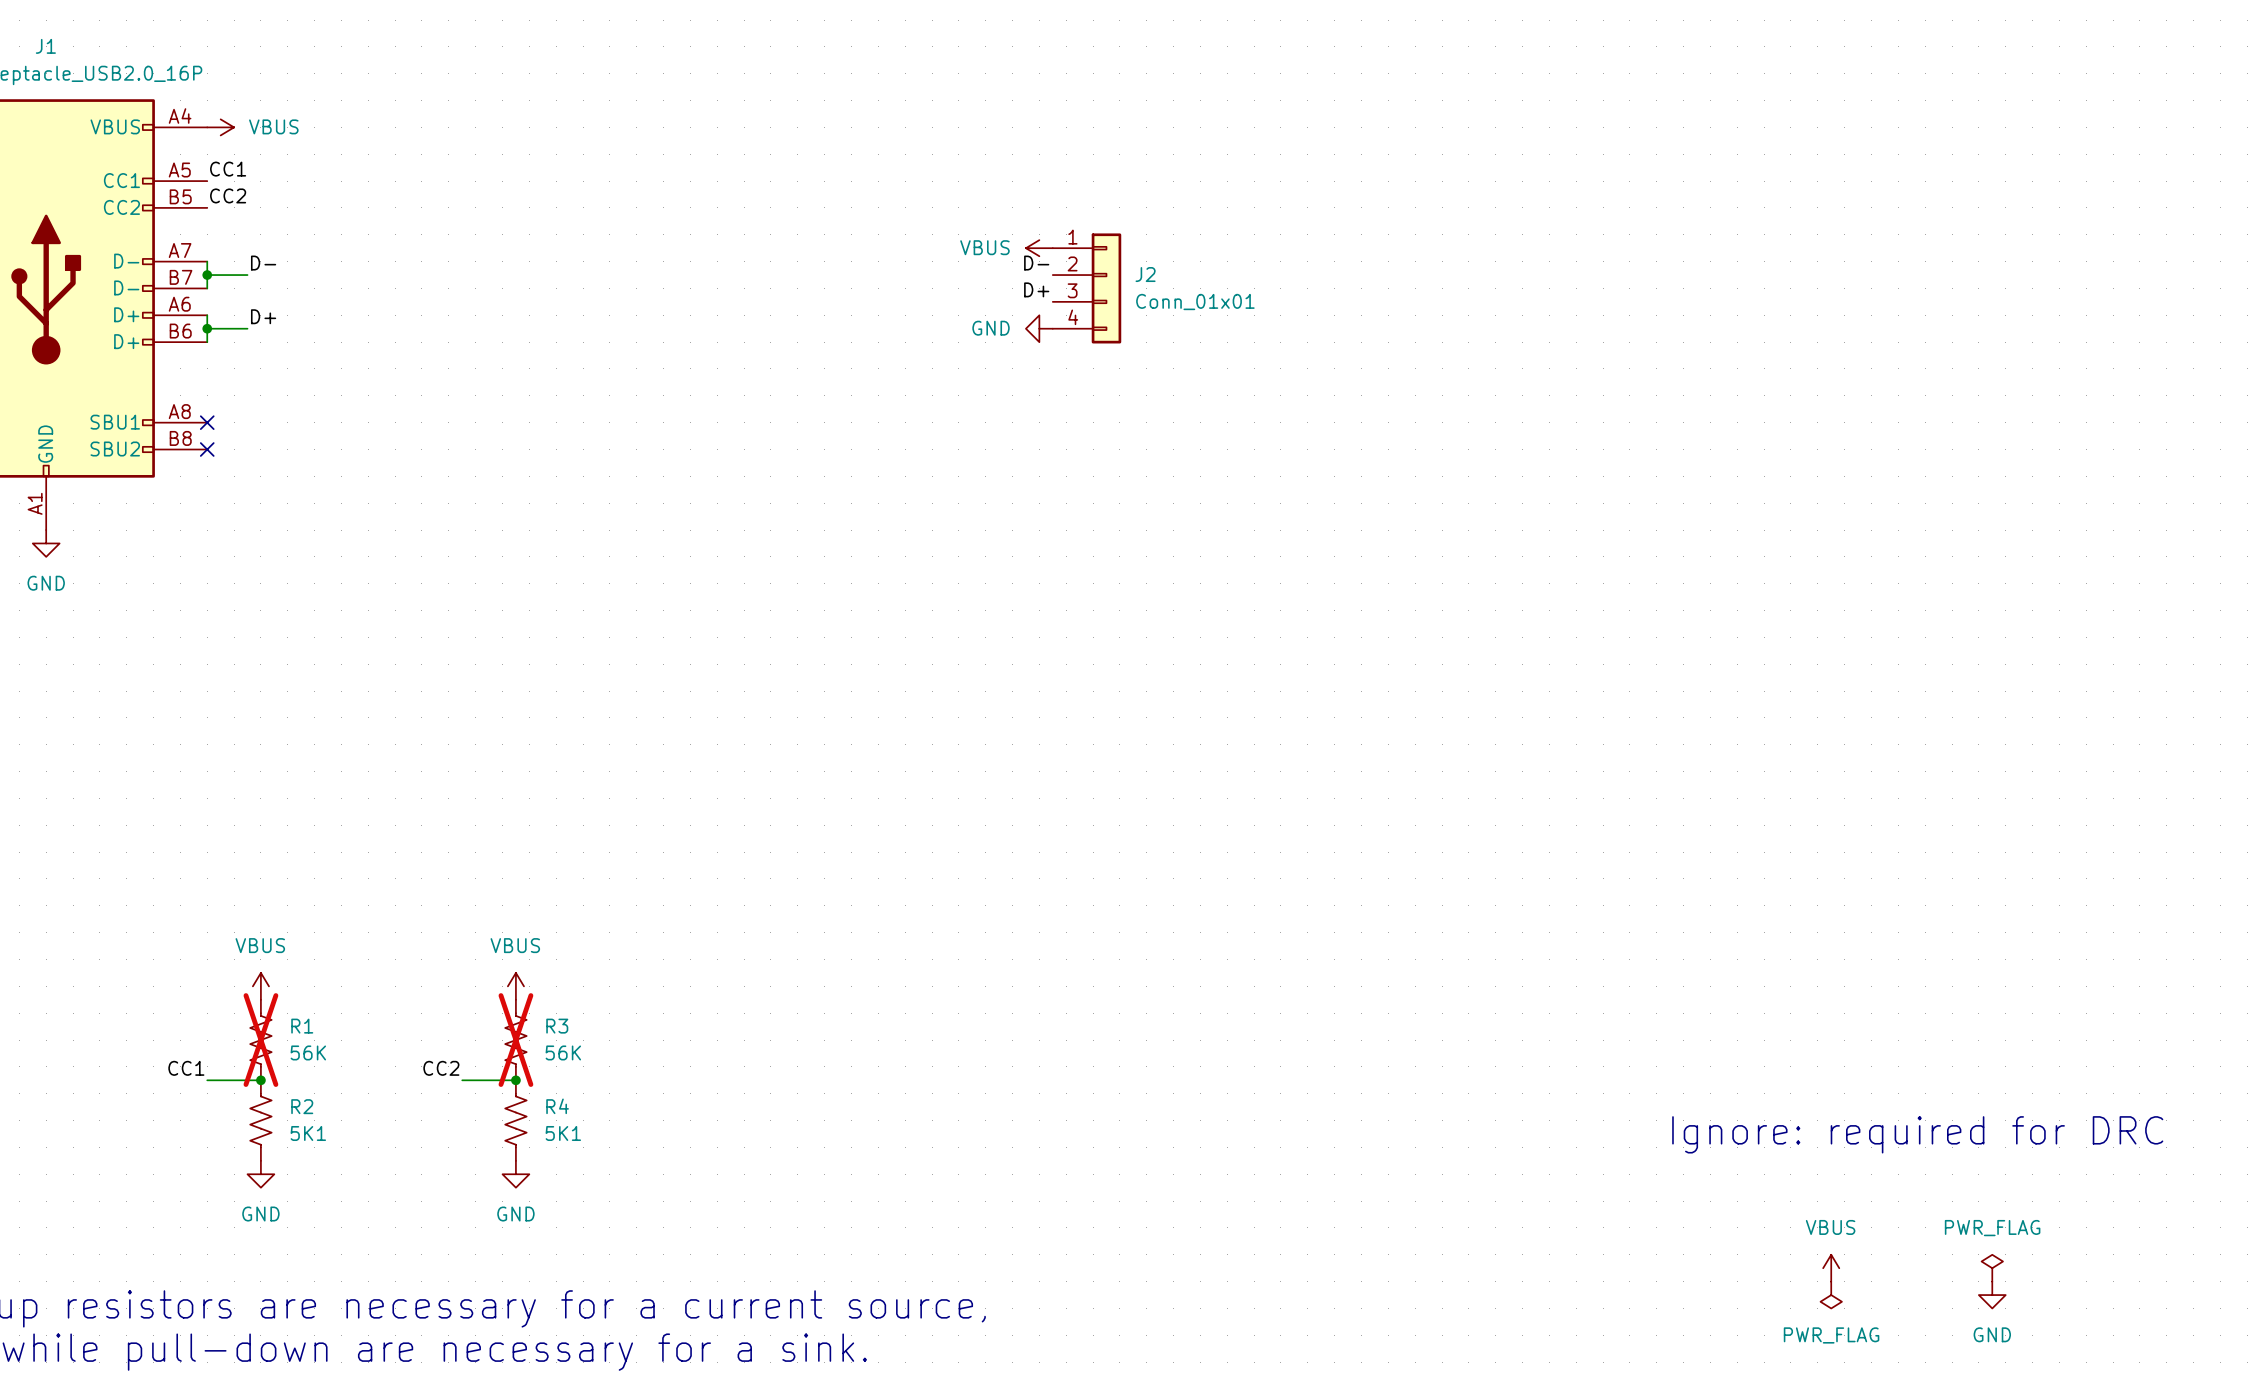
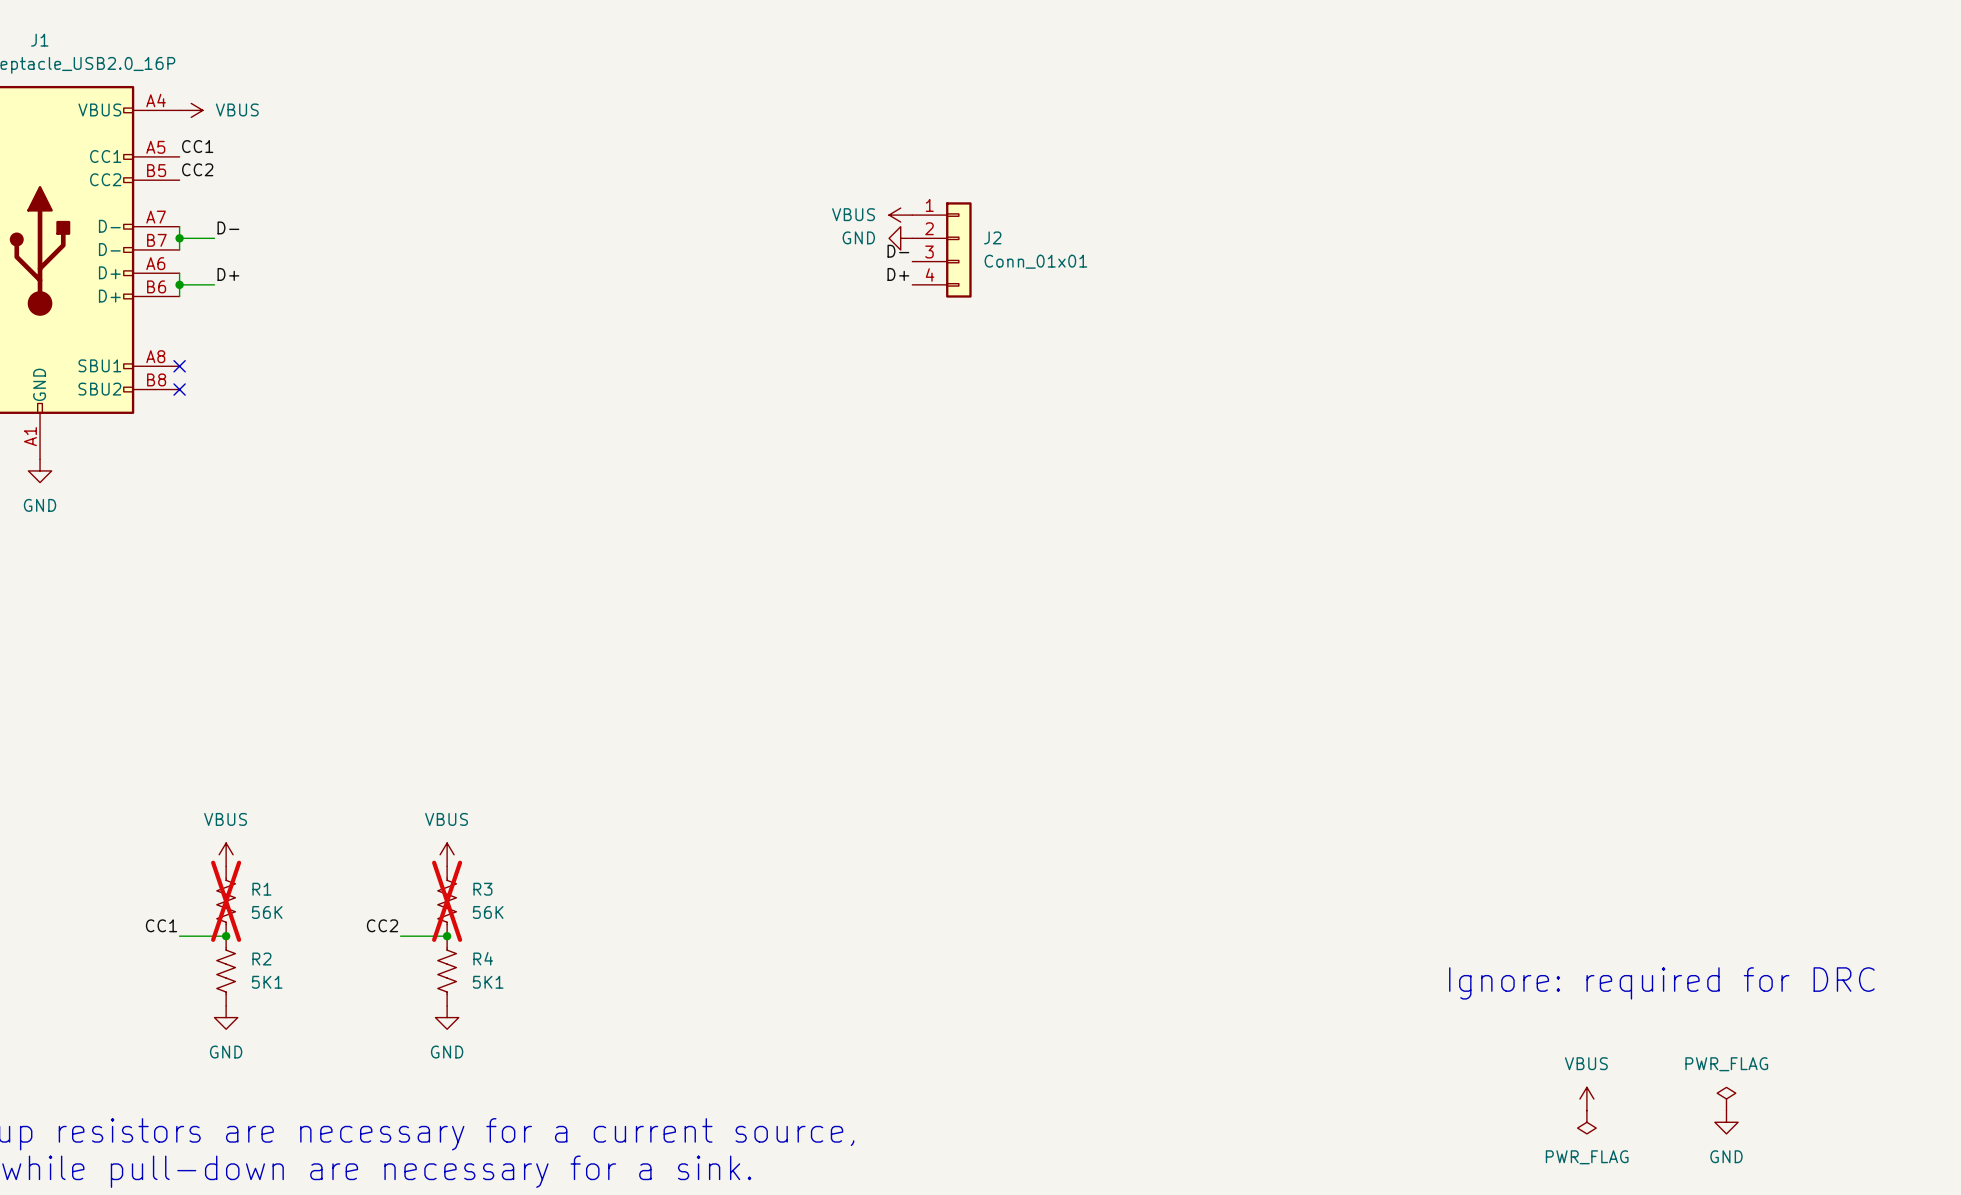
label: D- (1036, 263) -> none
label: D+ (1036, 289) -> D- (898, 251)
label: none -> D+ (898, 274)
power symbol position: GND (1039, 328) -> GND (900, 238)

